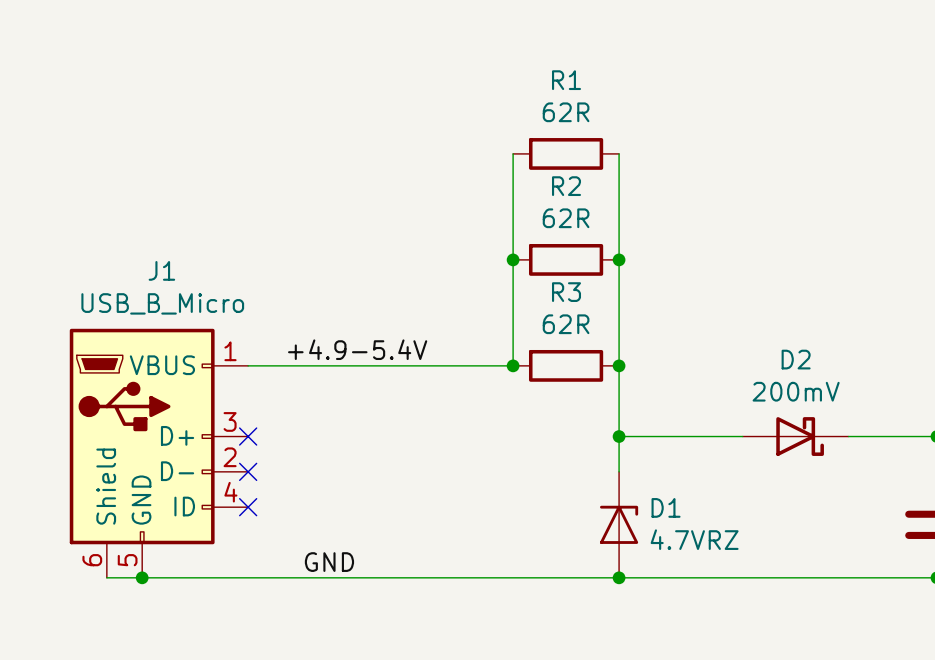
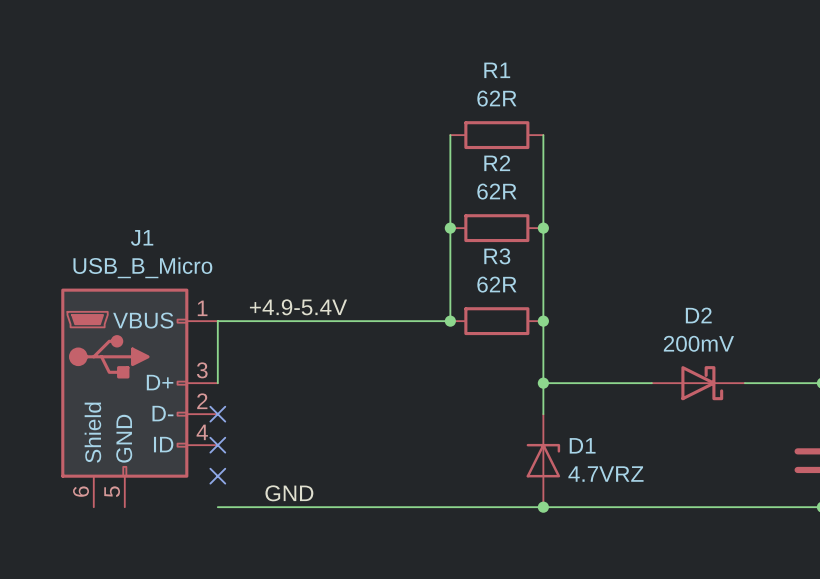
wire: none -> (217, 321) (217, 383)
no-connect mark: (248, 436) -> none
no-connect mark: none -> (217, 476)
wire: (106, 577) (248, 577) -> none
junction: (142, 577) -> none

